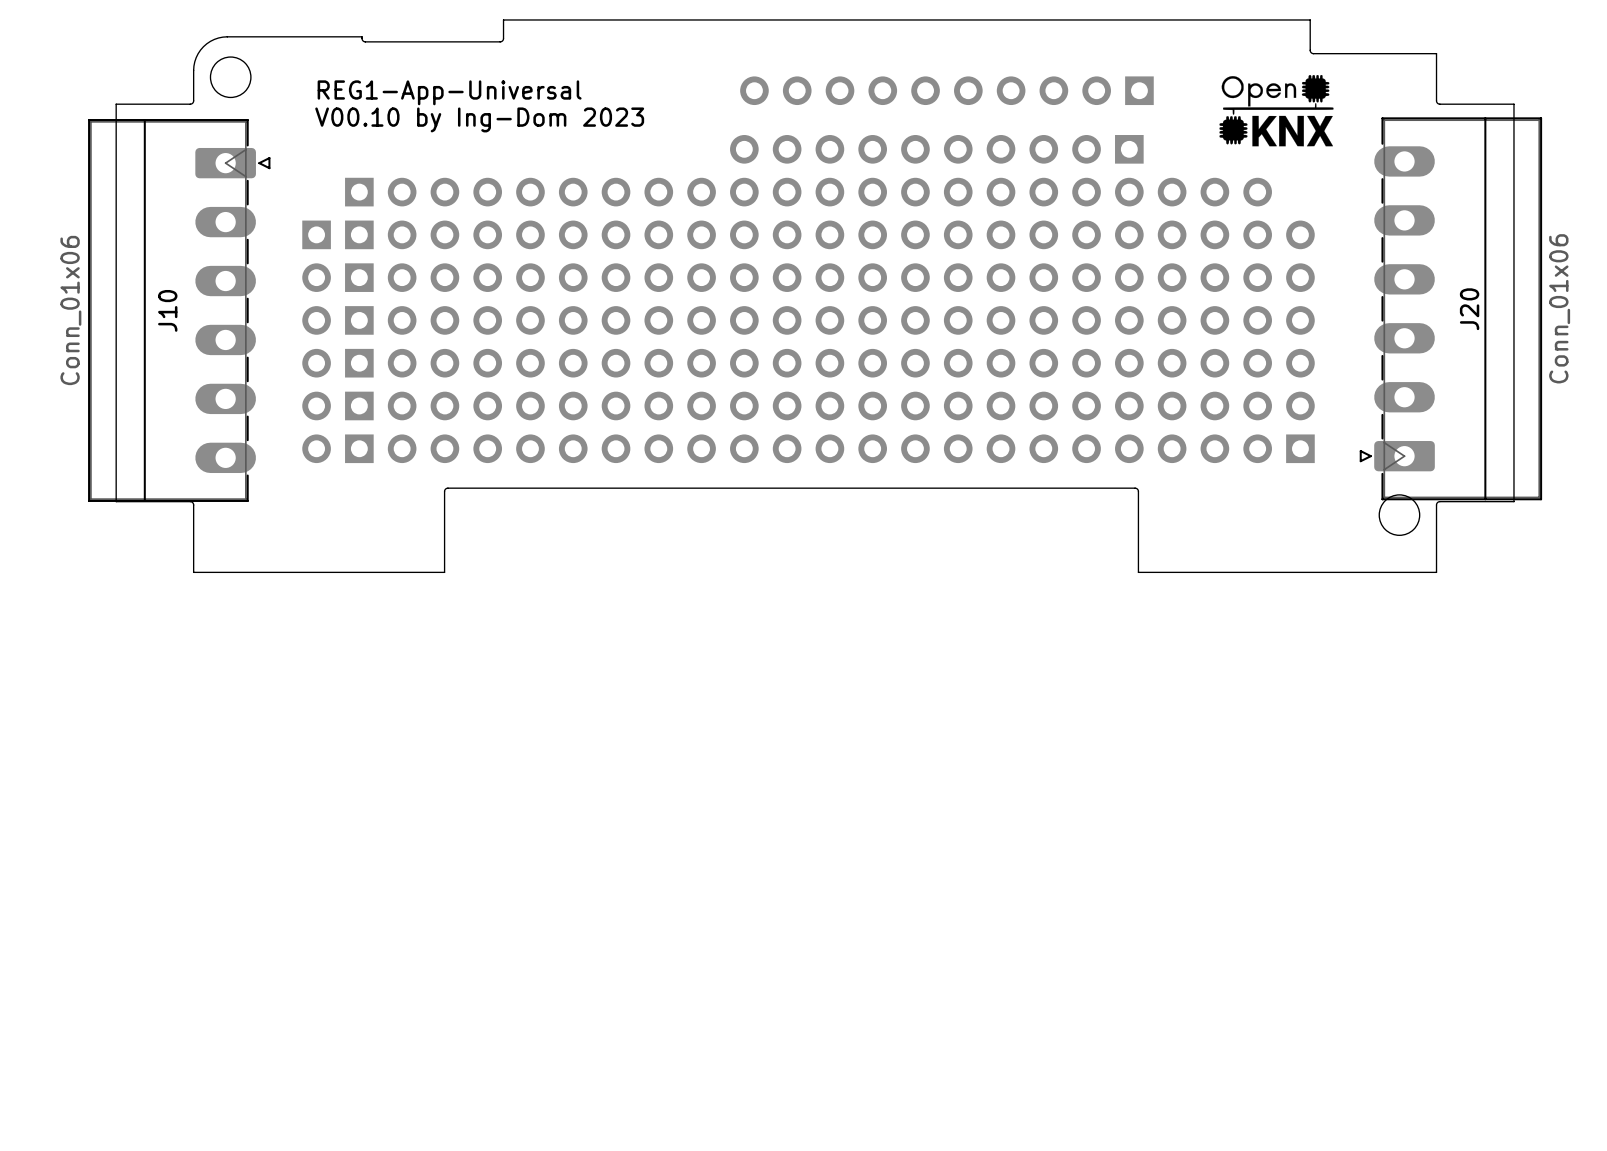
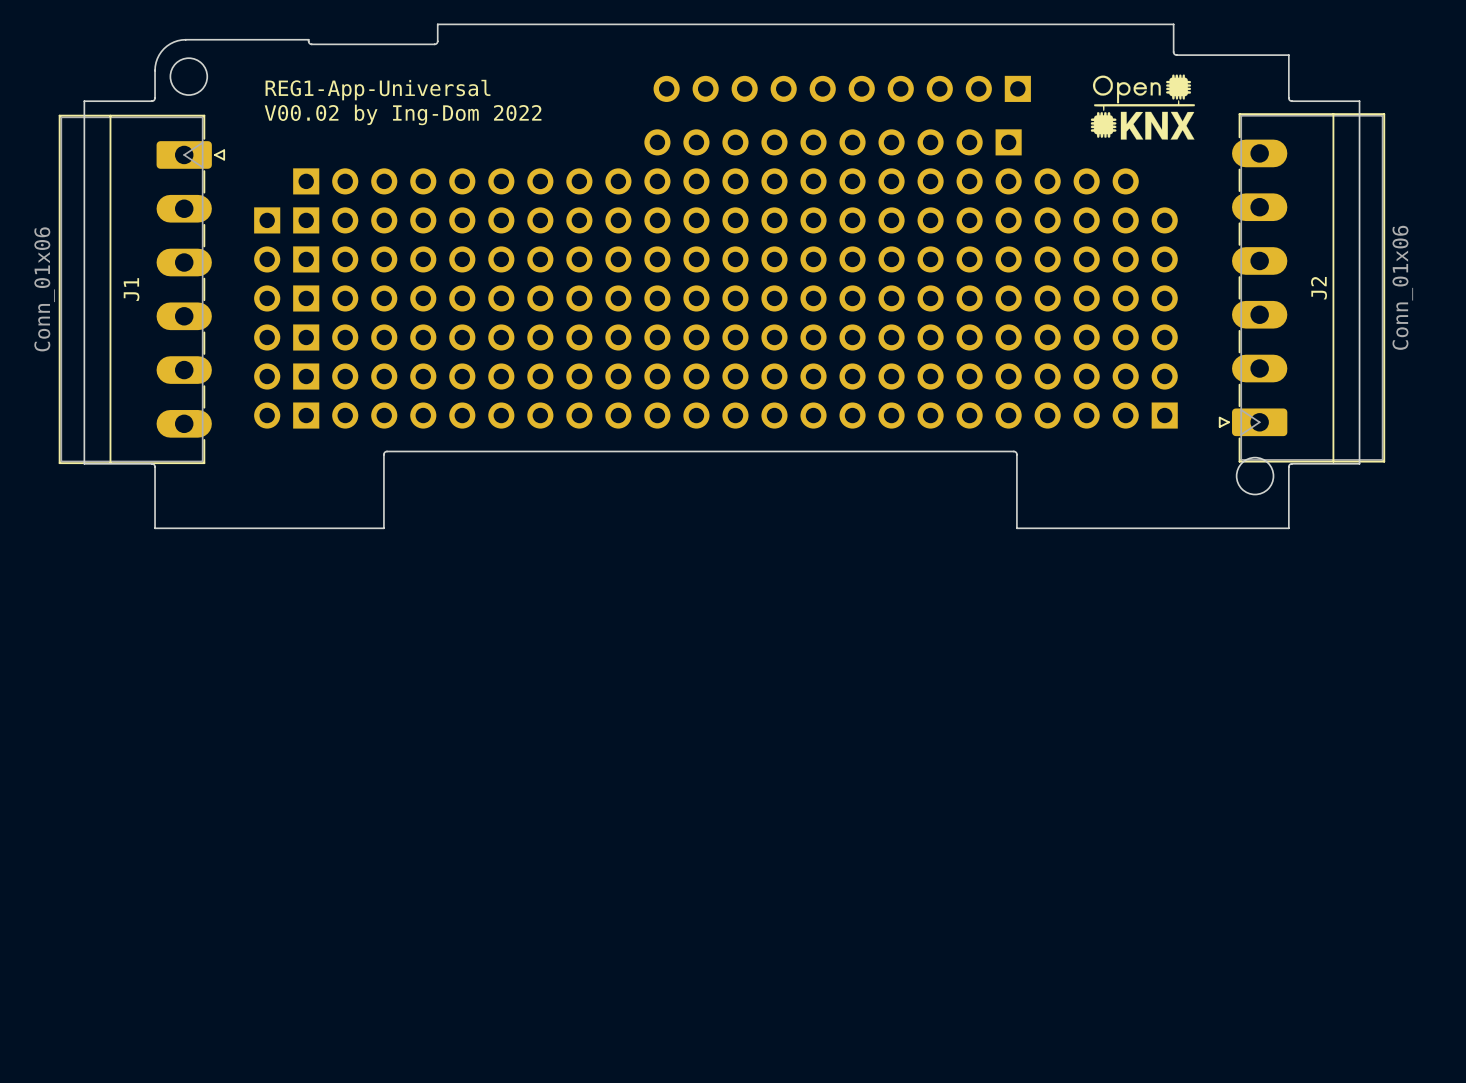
text: V00.10 by Ing-Dom 2023 (479, 119) -> V00.02 by Ing-Dom 2022 (403, 114)
J20 name: J20 (1469, 309) -> J2 (1319, 288)
J10 name: J10 (167, 310) -> J1 (131, 289)

